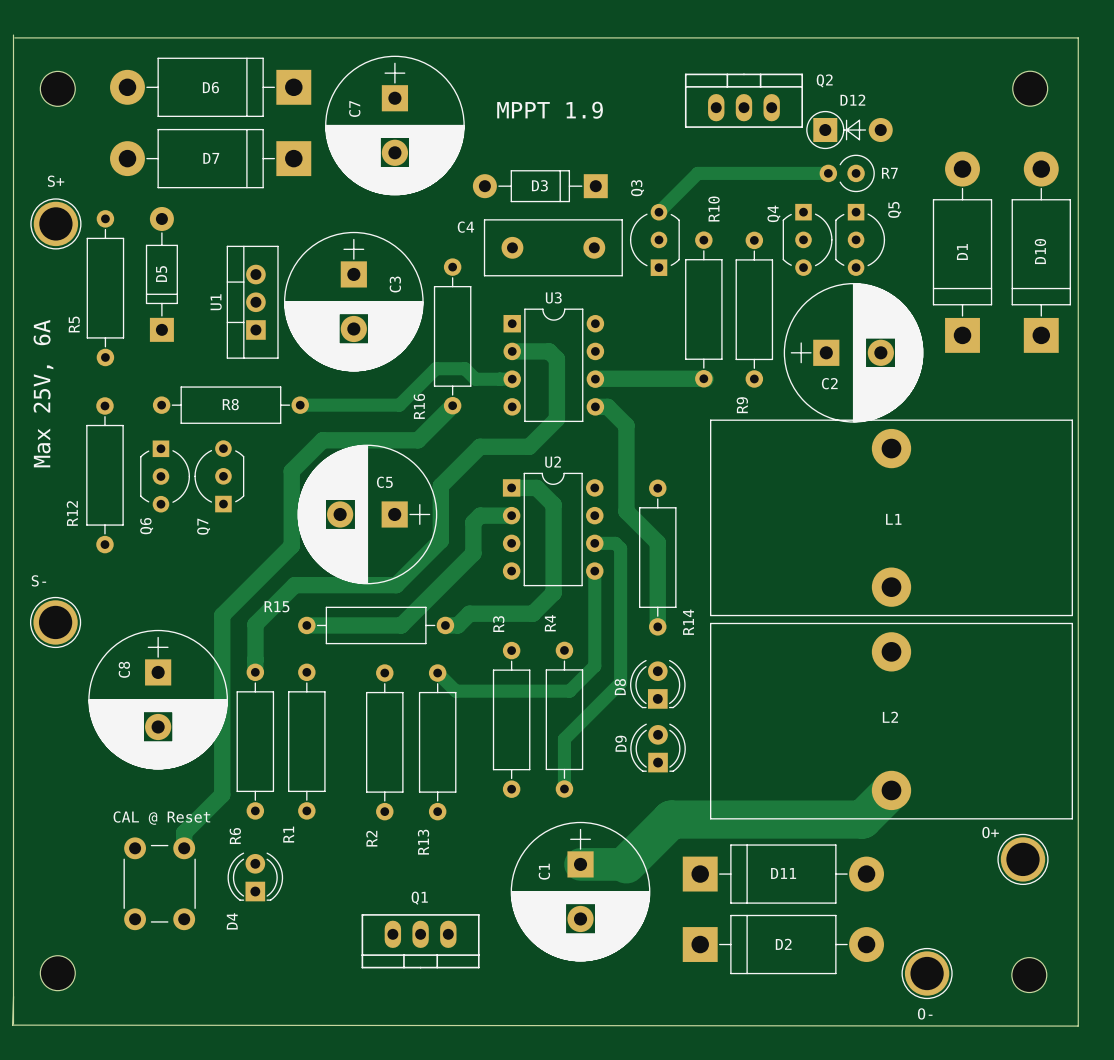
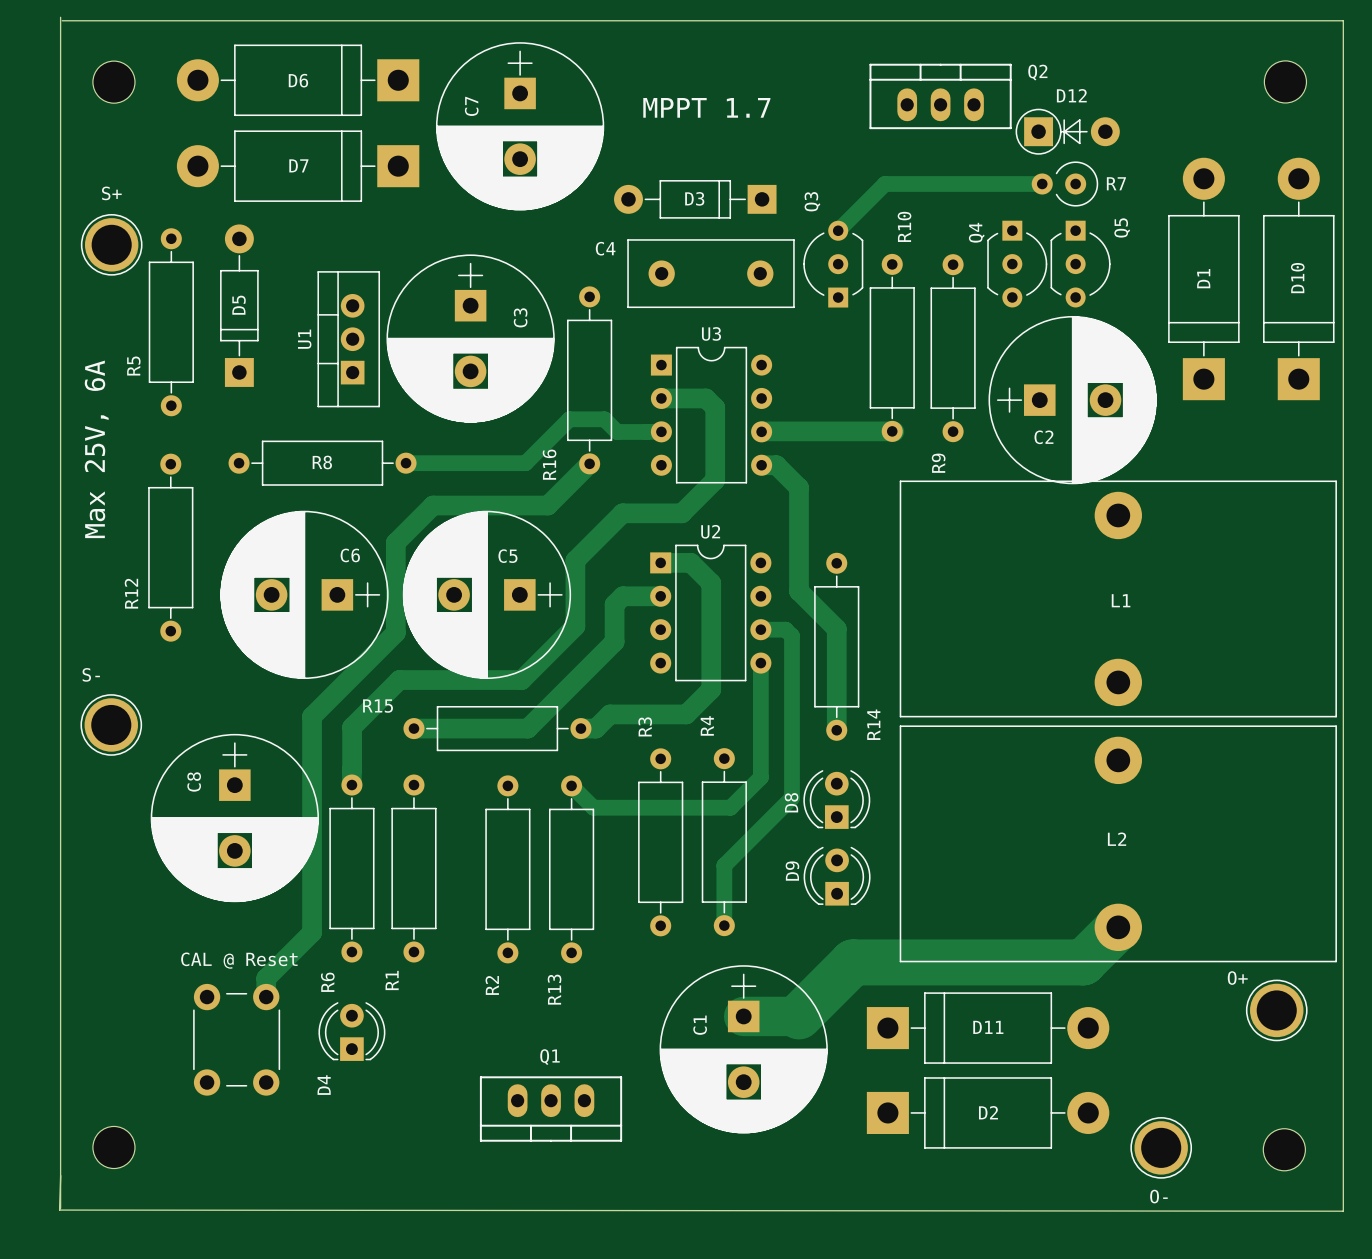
text: MPPT 1.9 (550, 110) -> MPPT 1.7 (706, 107)
Q6: (165, 476) -> none
Q7: (219, 476) -> none
C6: none -> (304, 594)

